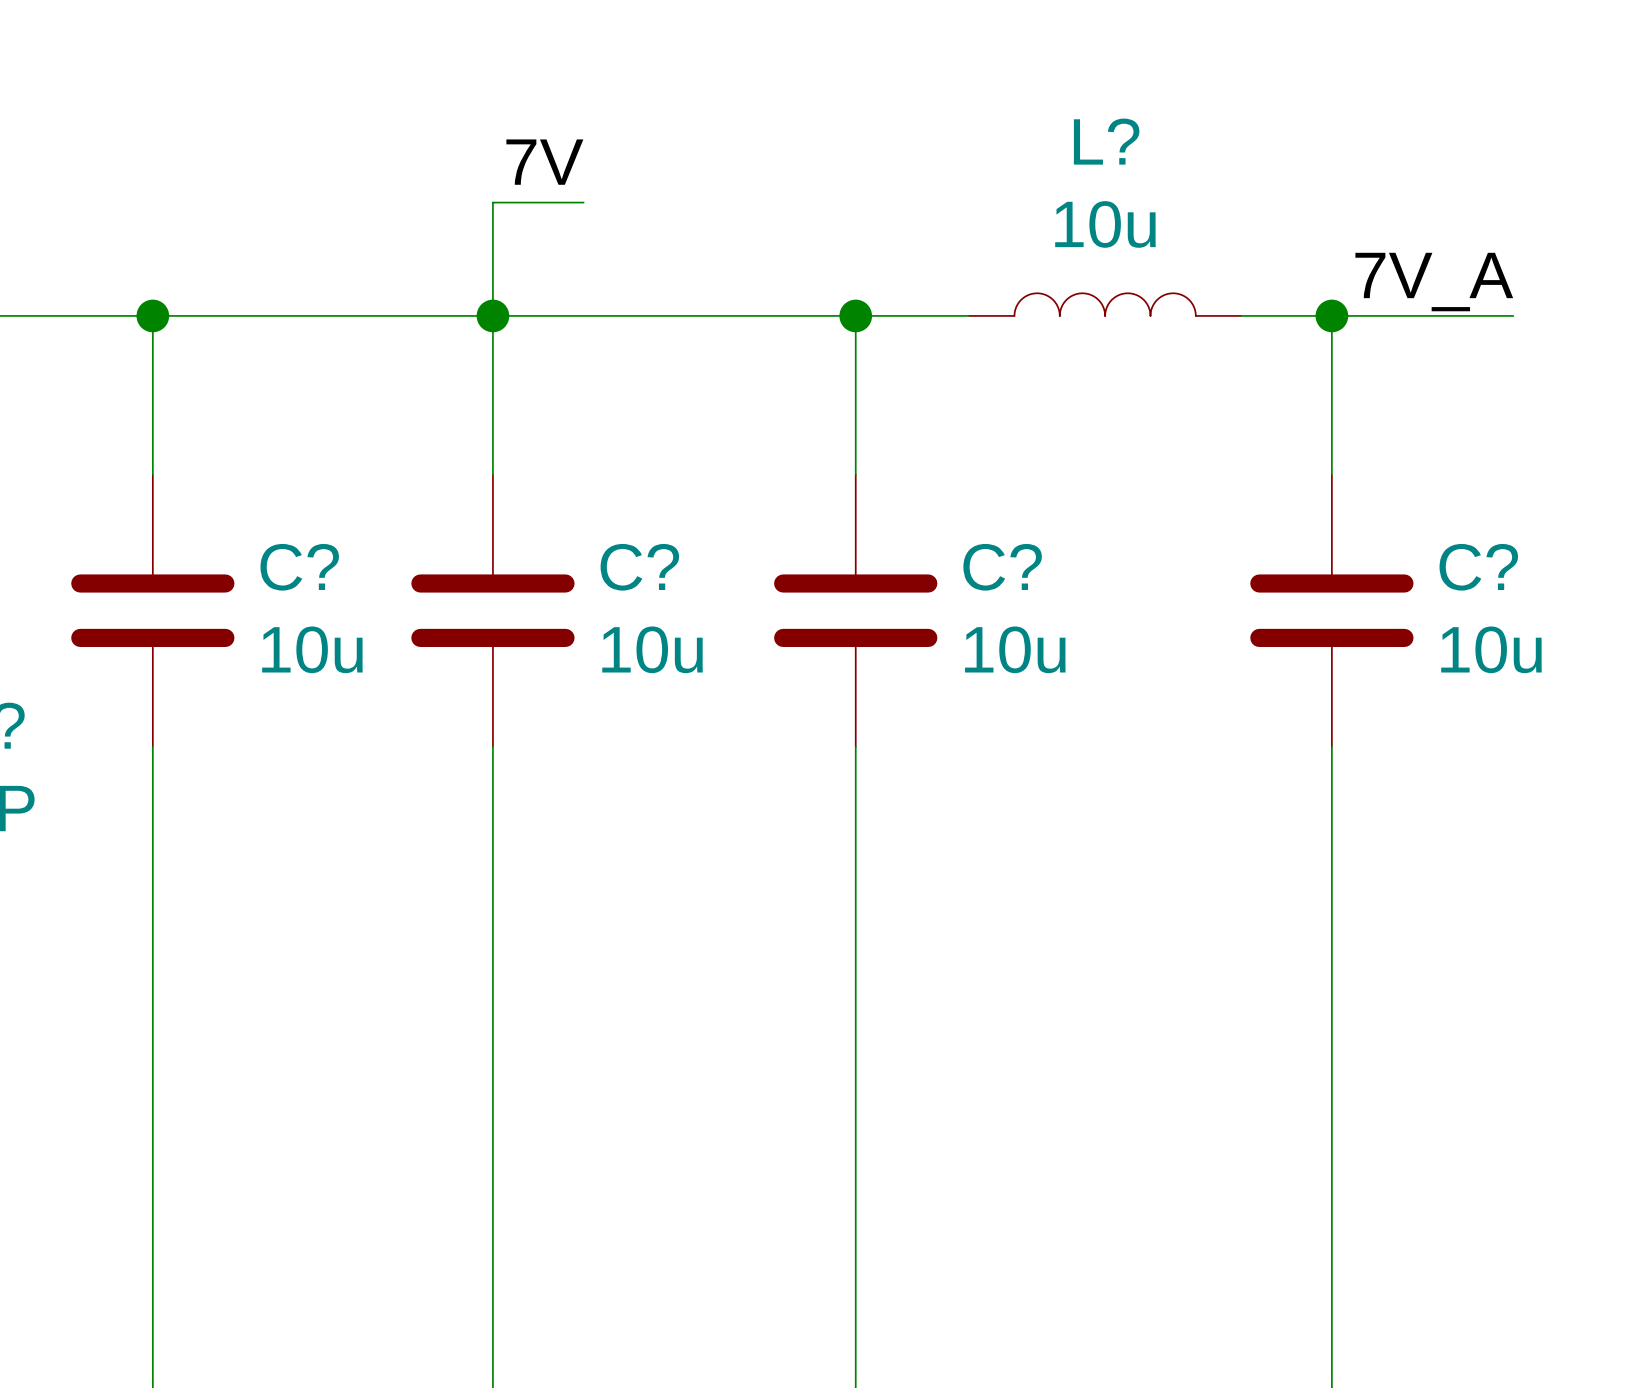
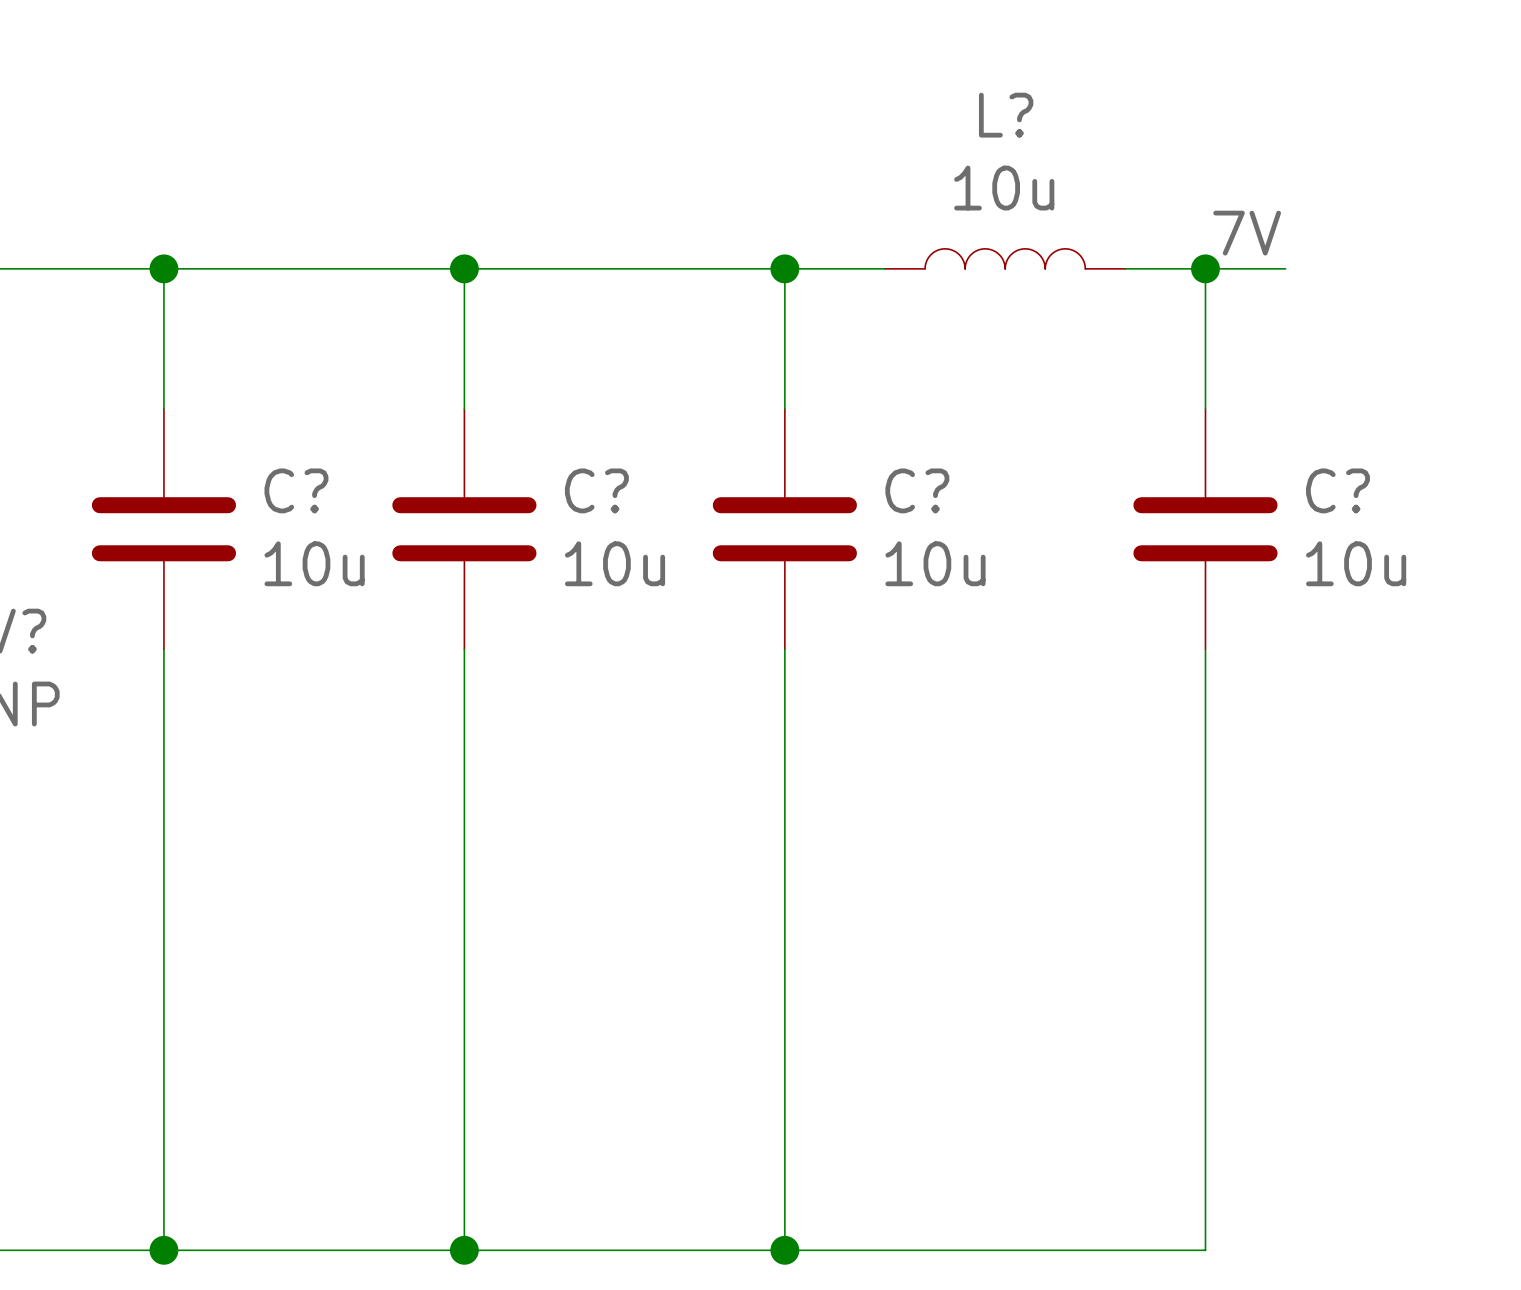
label position: 7V (544, 162) -> 7V (1247, 233)
wire: (583, 202) (492, 202) (492, 315) -> none
label: 7V_A (1434, 282) -> none
wire: (1422, 315) (1513, 315) -> none

